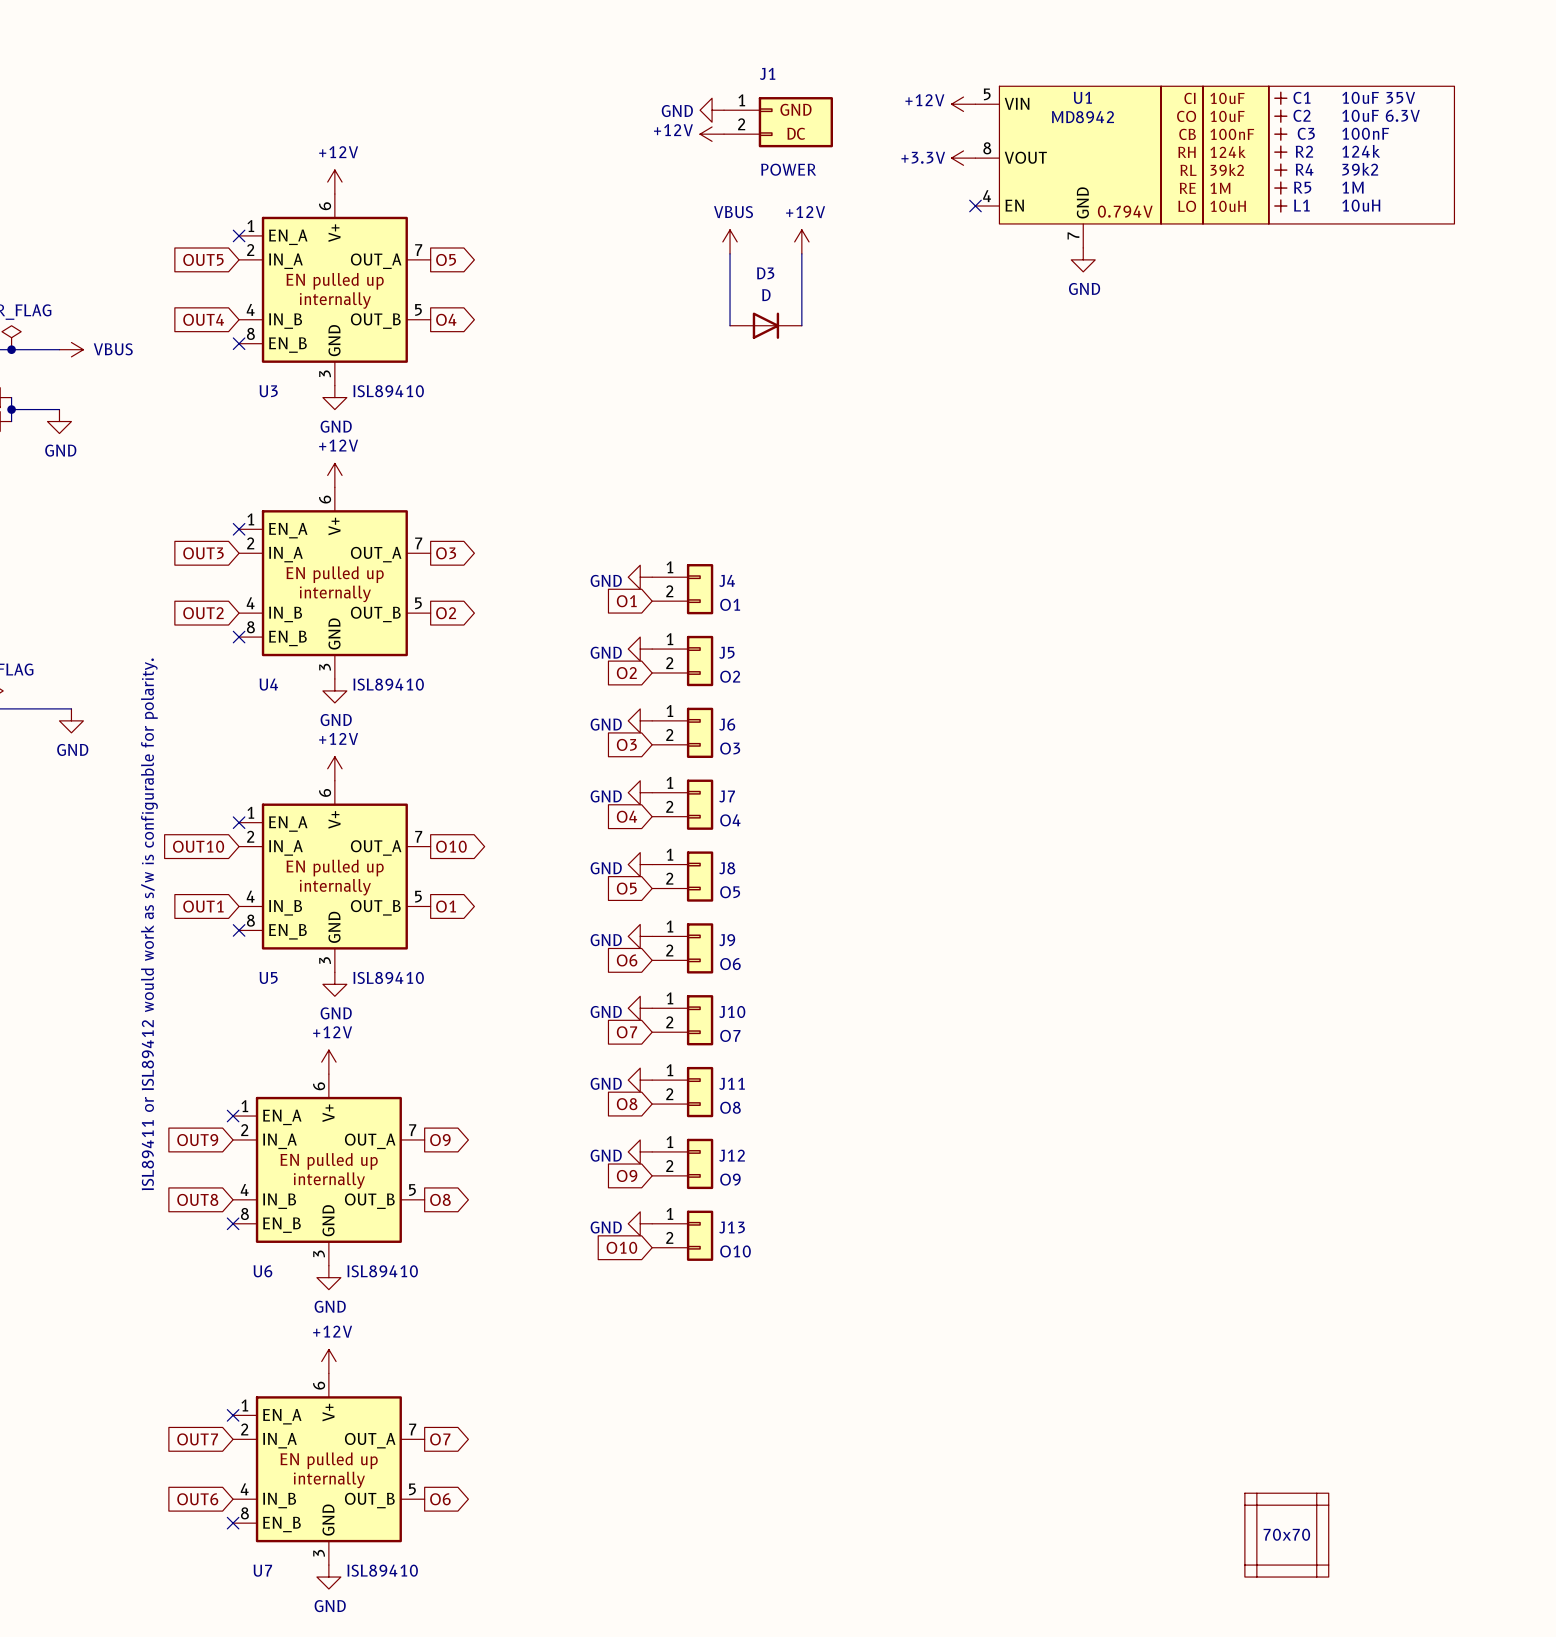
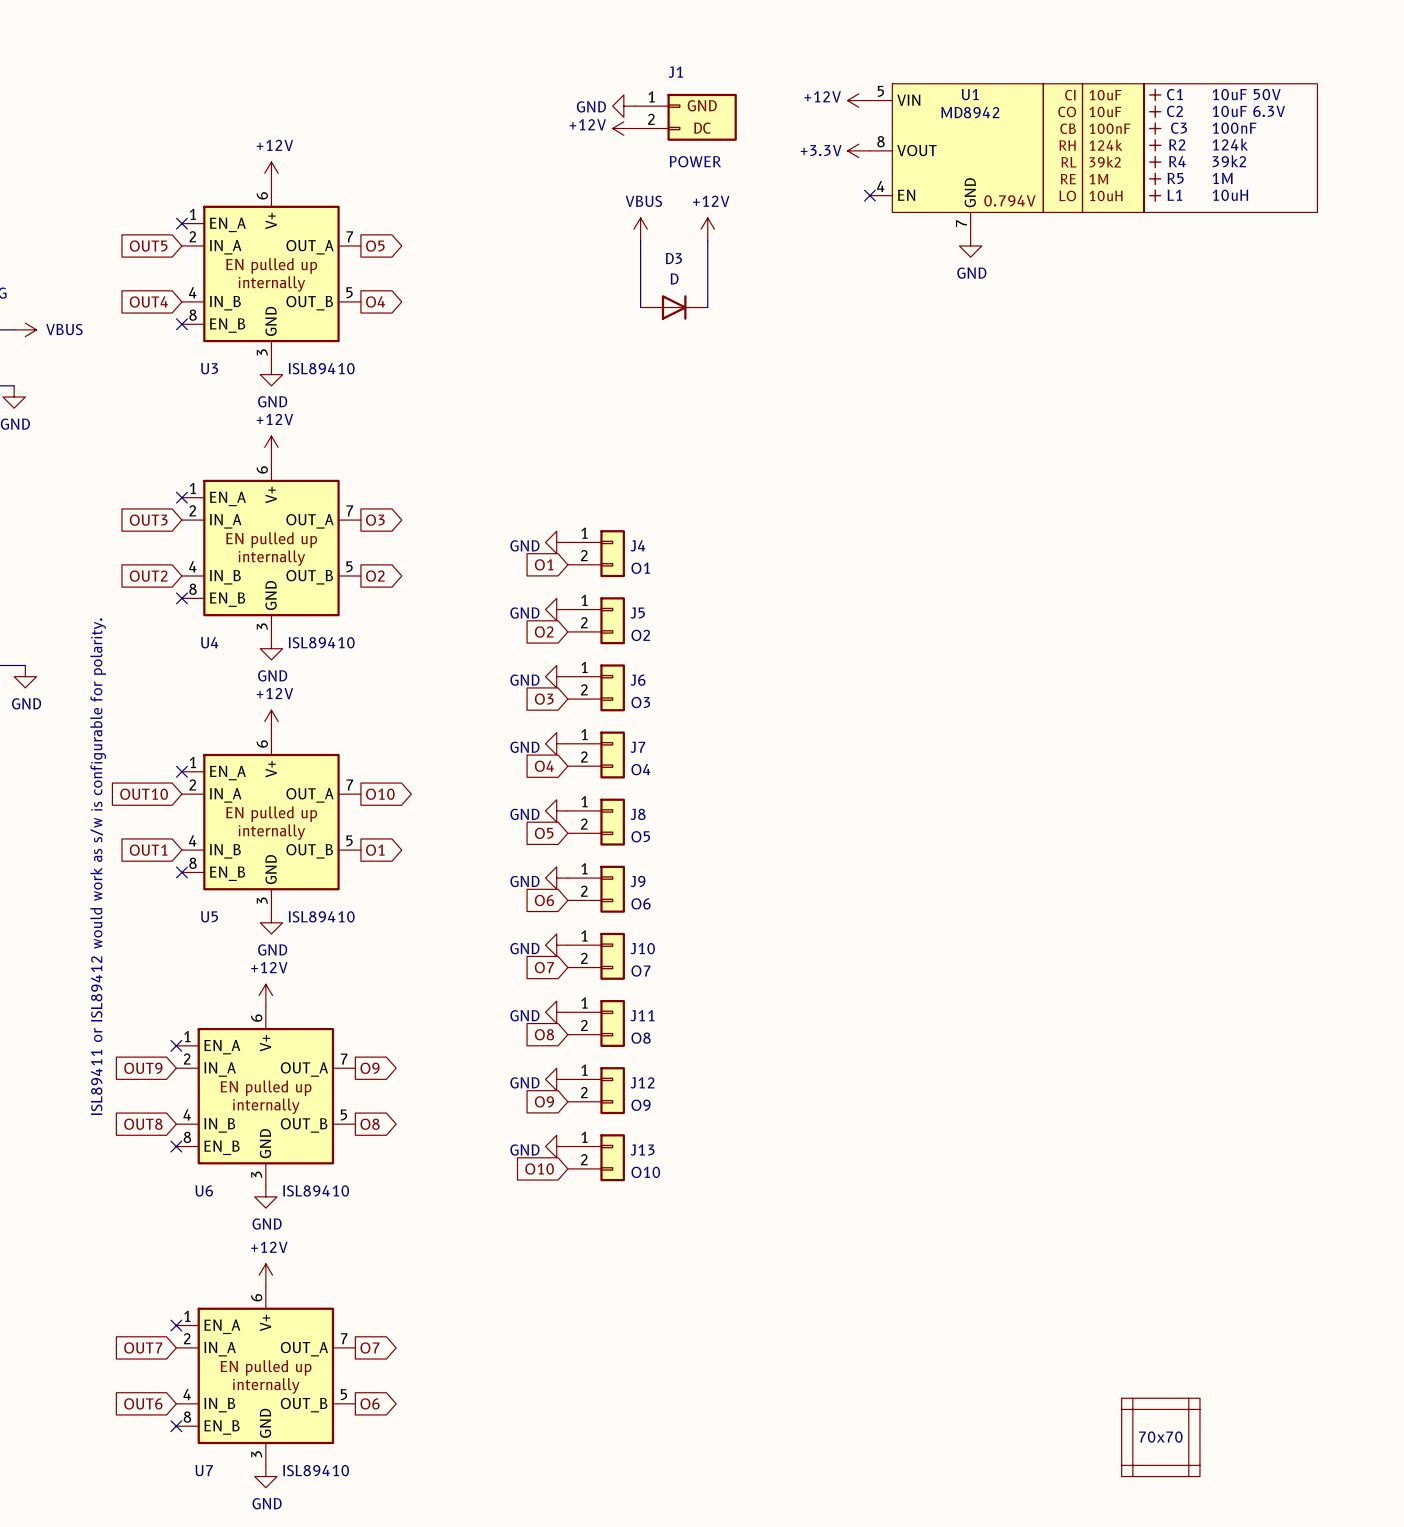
C1 value: 10uF 35V (1378, 97) -> 10uF 50V (1246, 94)

